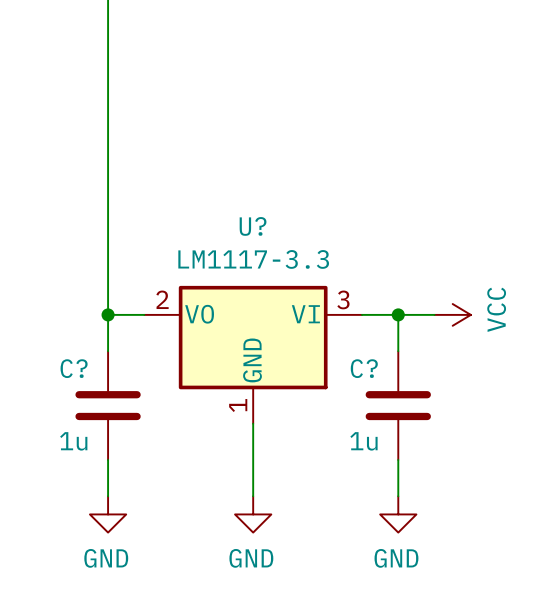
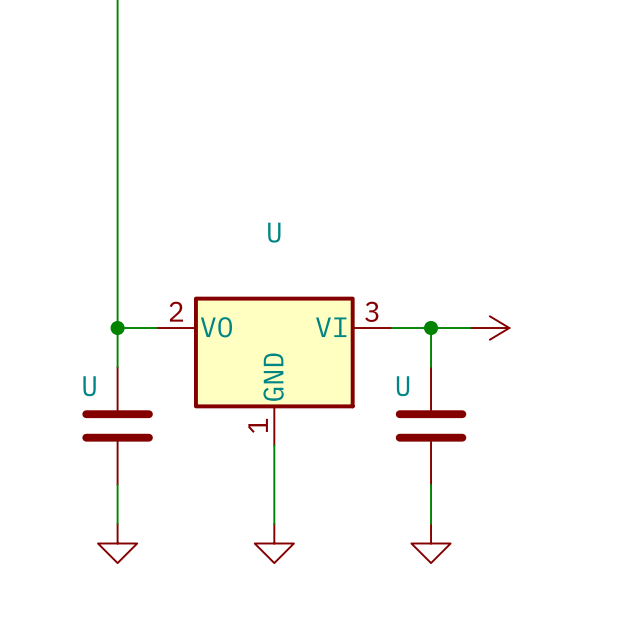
U? name: U? (253, 226) -> U (274, 232)
U? value: LM1117-3.3 (253, 259) -> none
power symbol text: VCC (496, 309) -> none
C? name: C? (74, 368) -> U (89, 386)
C? name: C? (364, 368) -> U (403, 386)
C? value: 1u (73, 441) -> none
C? value: 1u (363, 441) -> none
power symbol text: GND (106, 558) -> none
power symbol text: GND (251, 558) -> none
power symbol text: GND (396, 558) -> none

